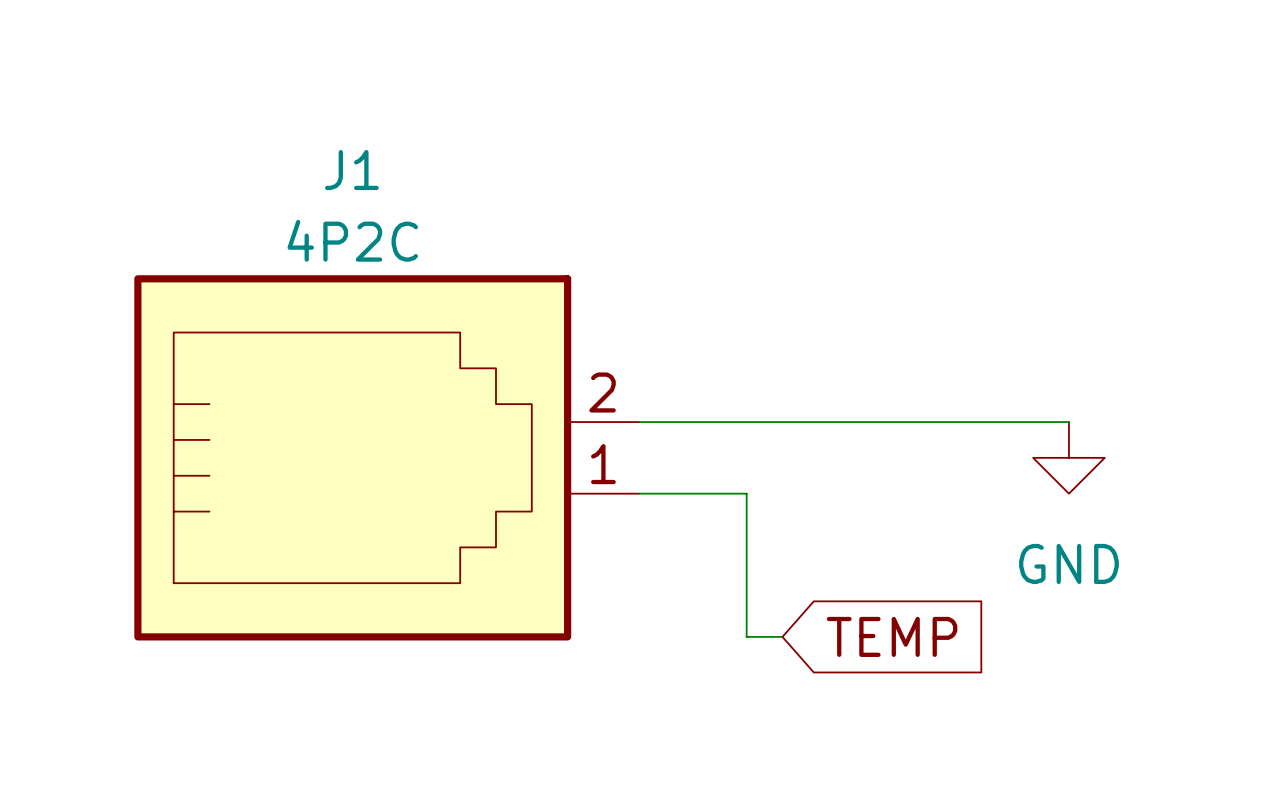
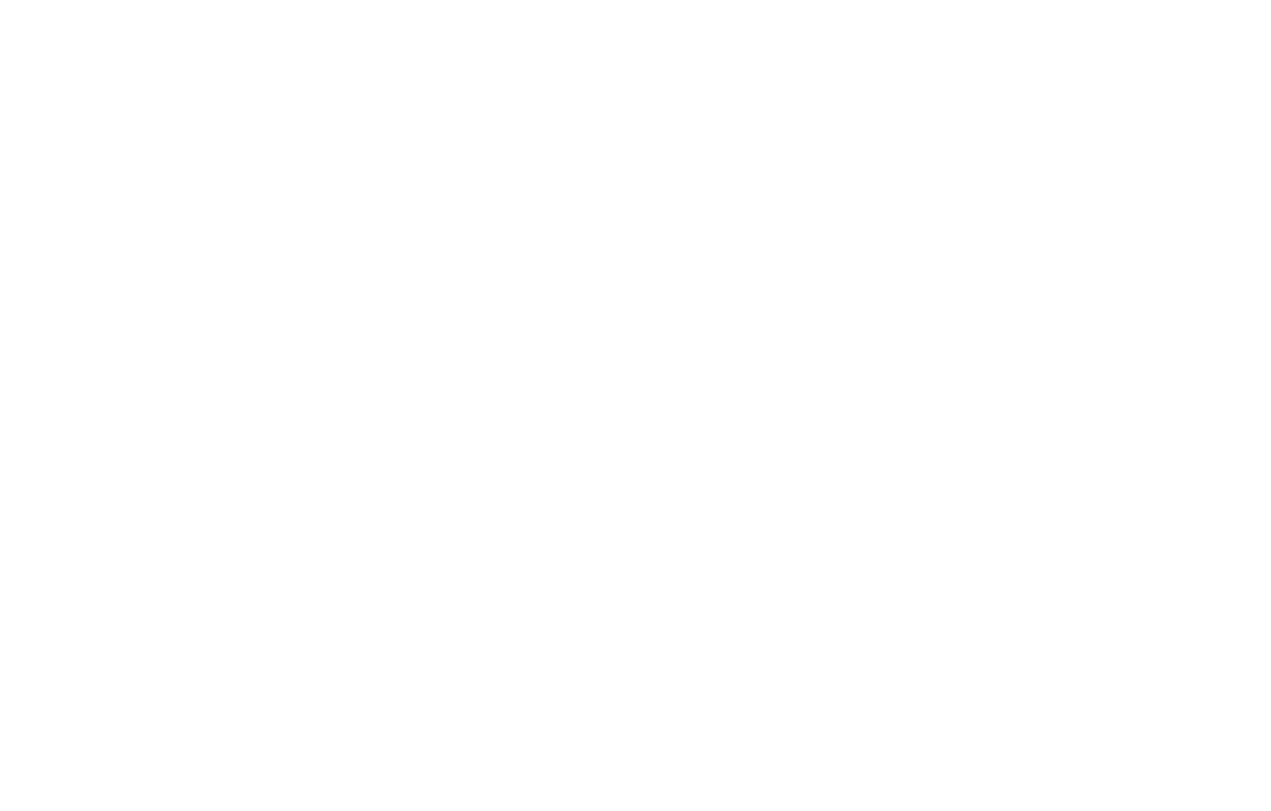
wire: (639, 422) (1068, 422) -> none
J1: 4P2C (386, 457) -> none
power symbol: GND (1068, 457) -> none
wire: (639, 493) (746, 493) (746, 636) (782, 636) -> none
global label: TEMP (892, 636) -> none

